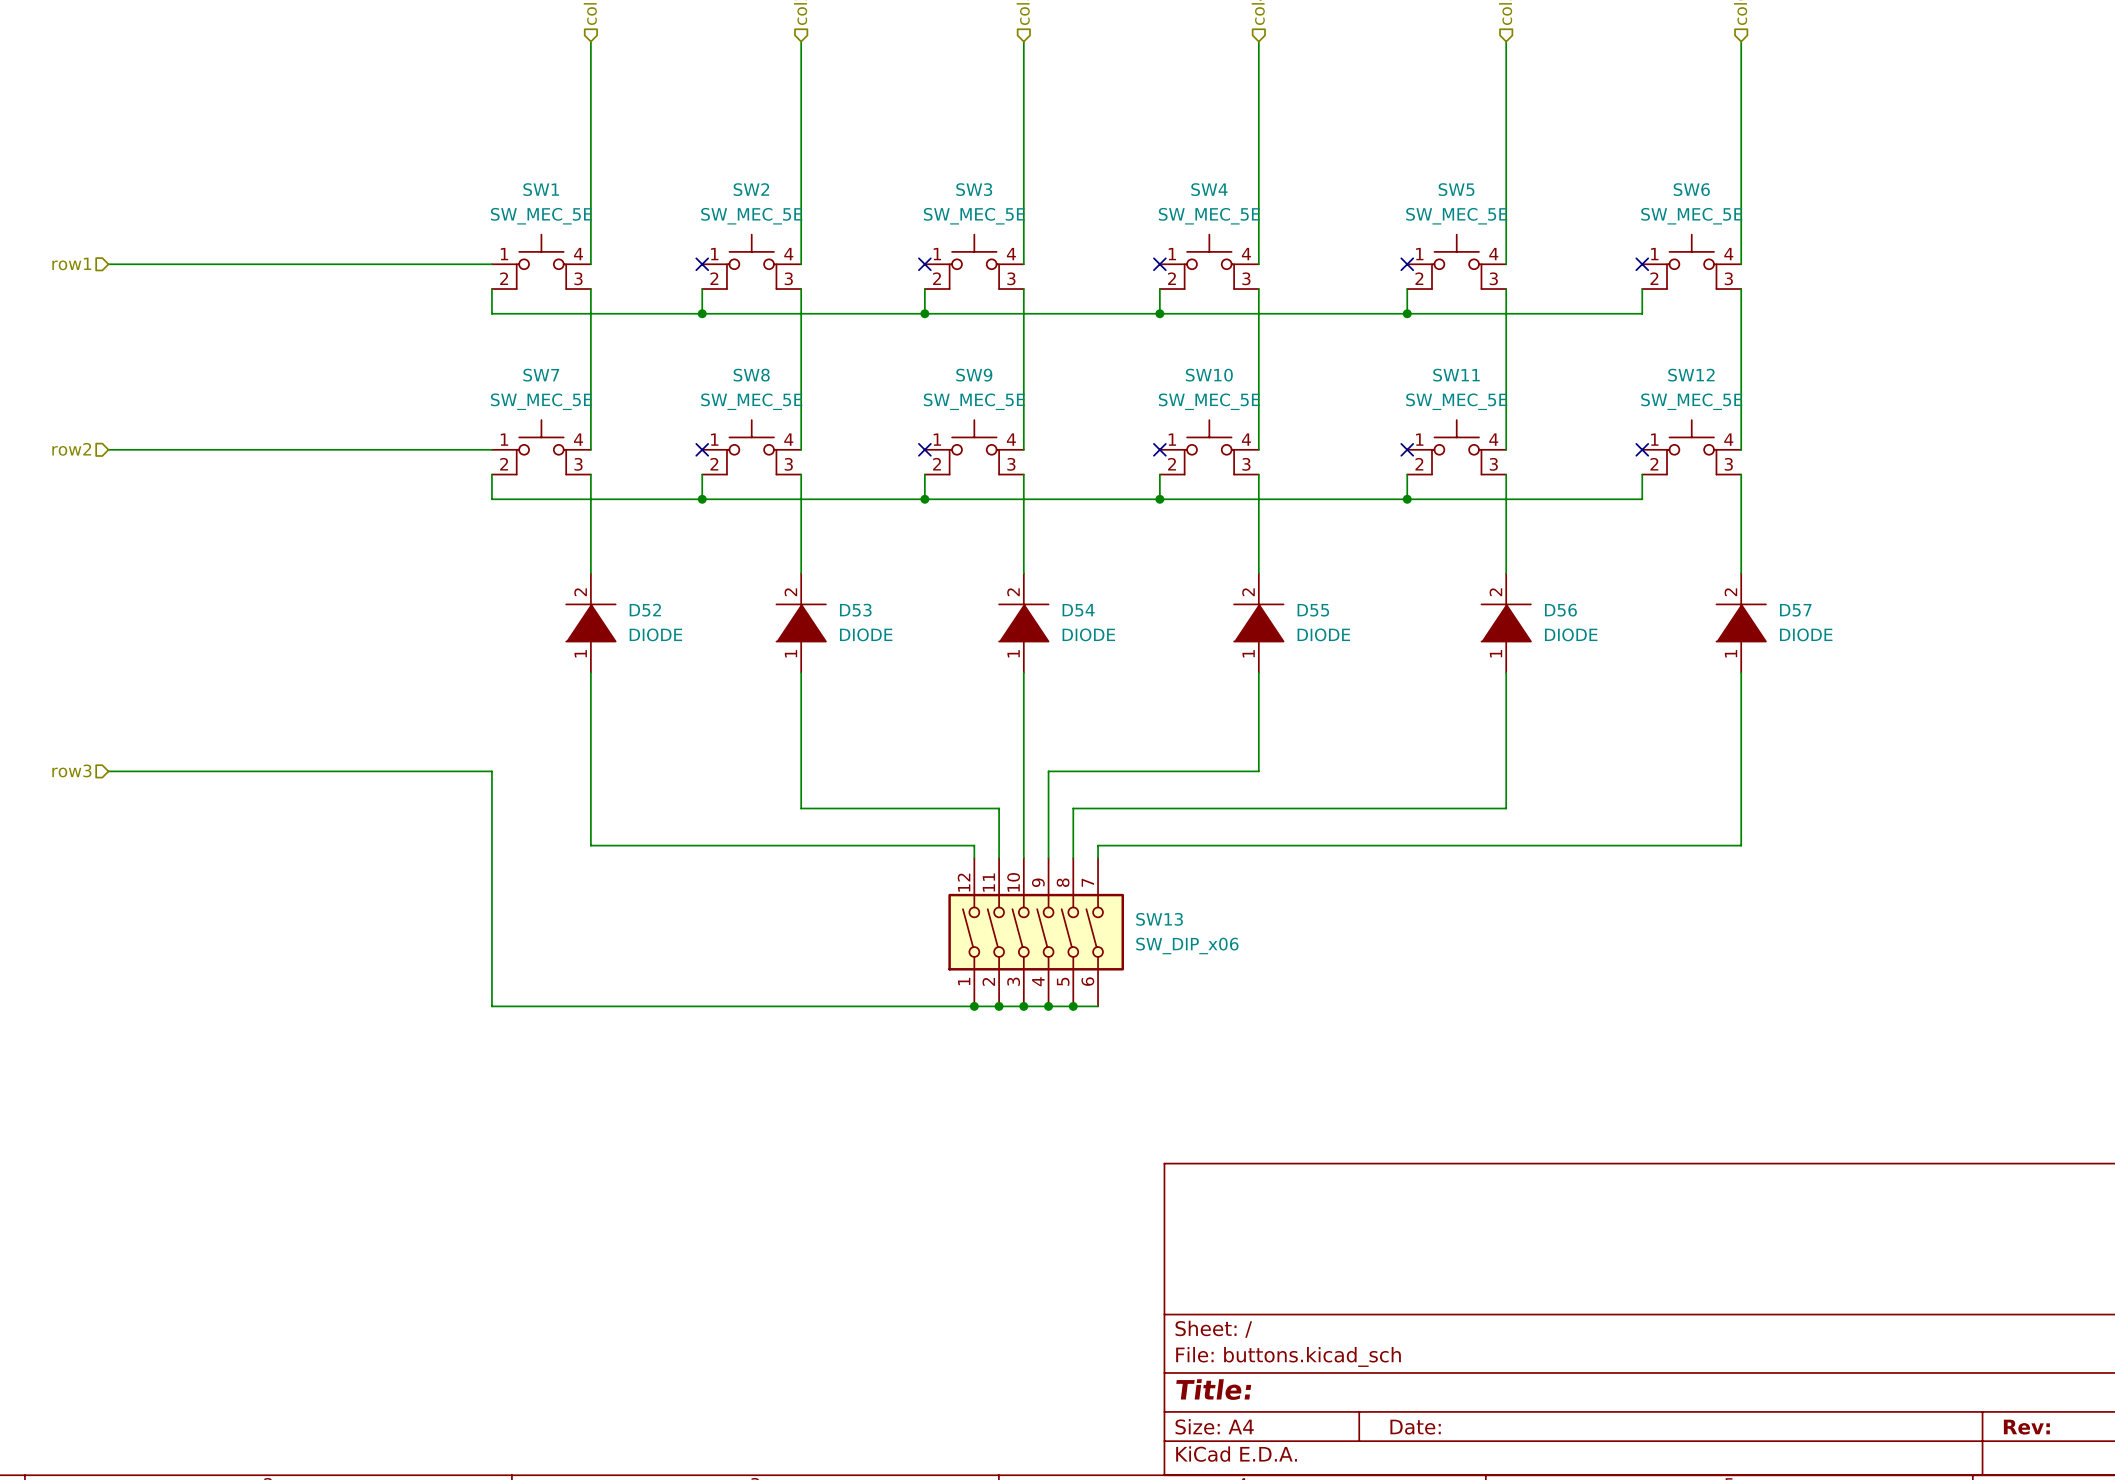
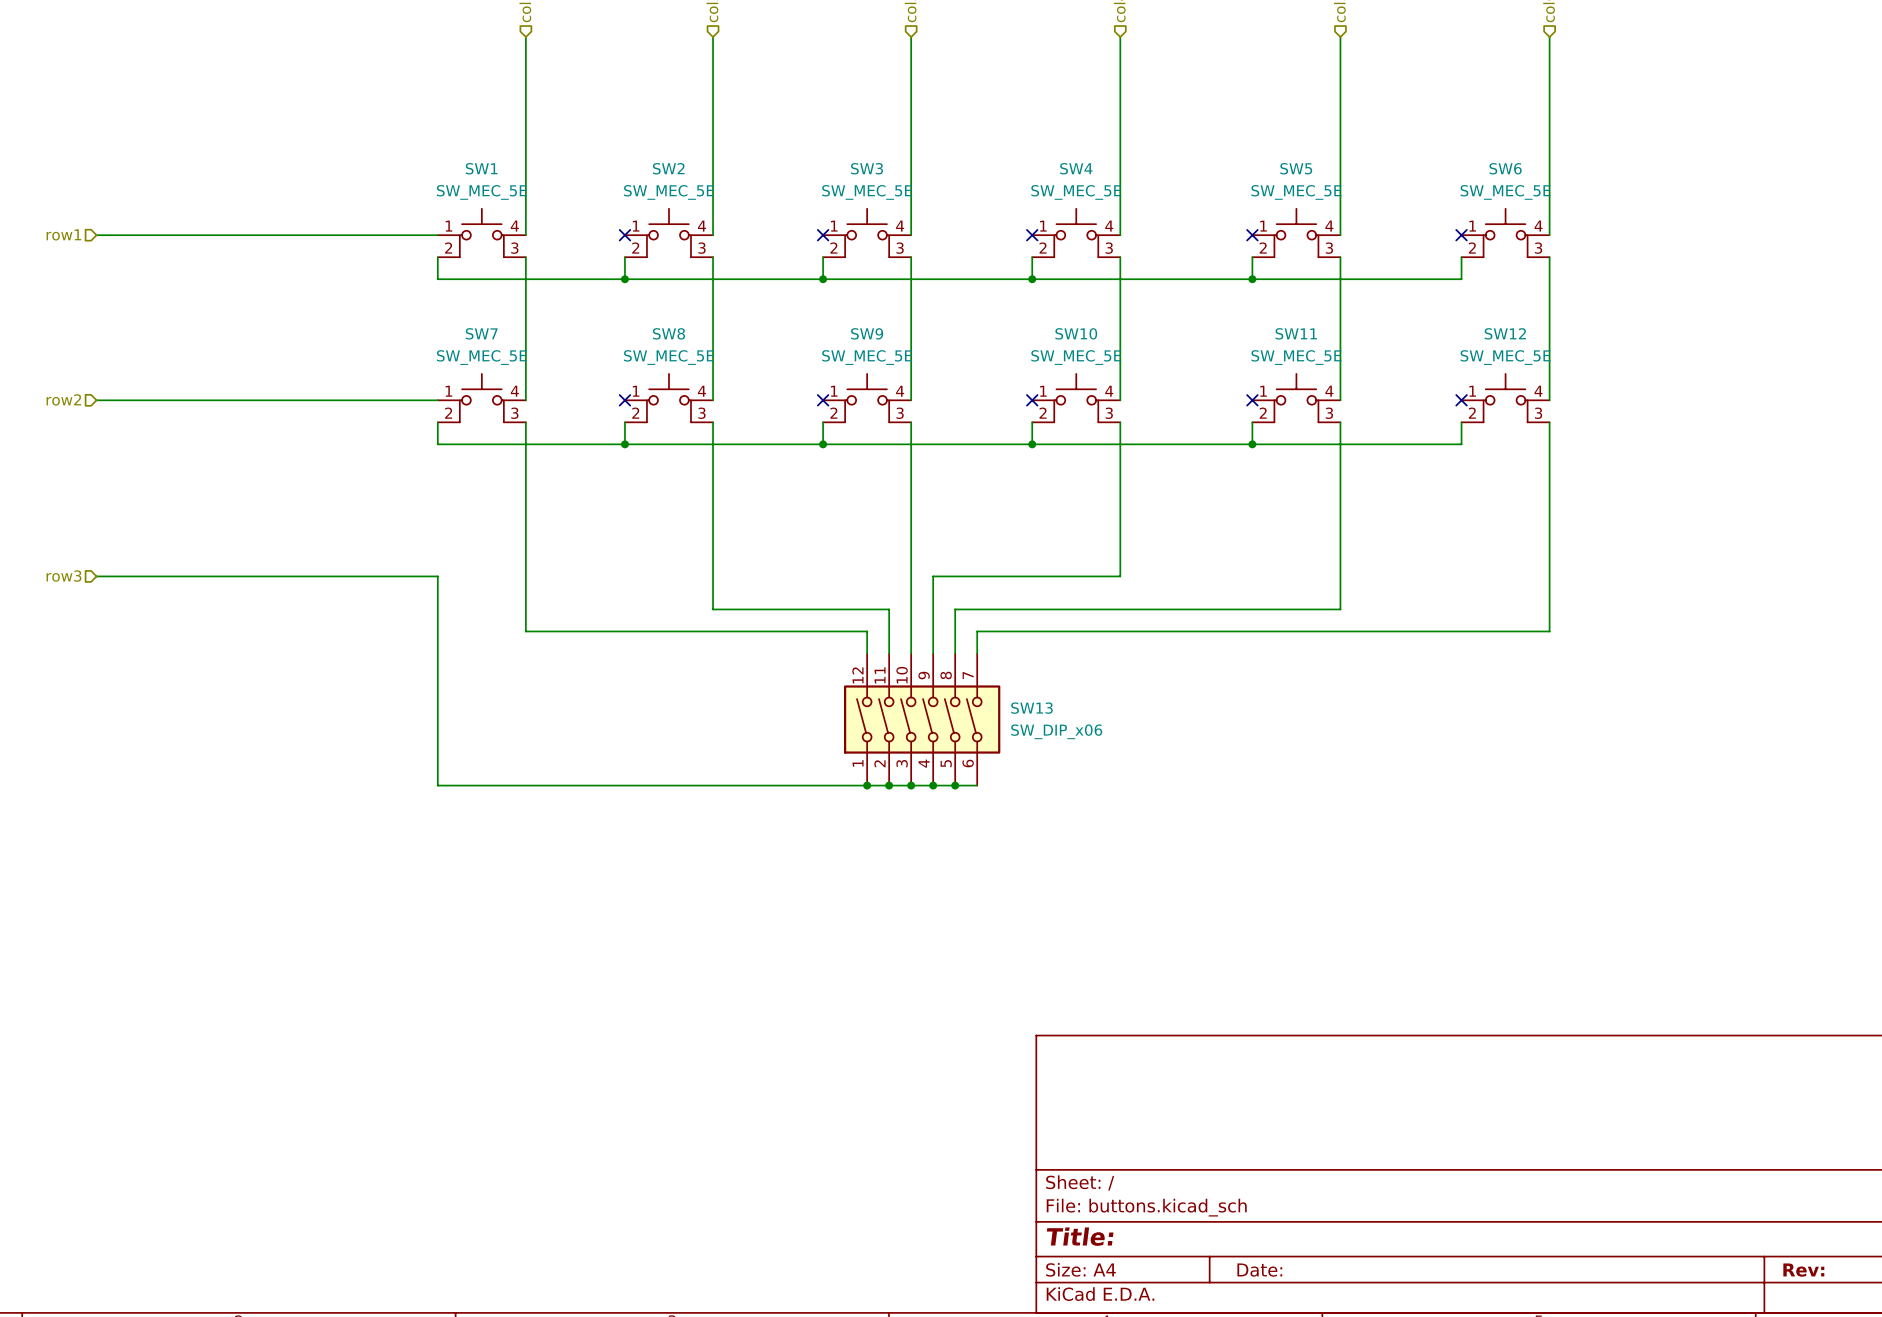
wire: none -> (1120, 510) (1120, 576) (933, 576) (933, 653)
D52: DIODE (590, 622) -> none
D53: DIODE (801, 622) -> none
D54: DIODE (1023, 622) -> none
D55: DIODE (1258, 622) -> none
D56: DIODE (1506, 622) -> none
D57: DIODE (1741, 622) -> none
wire: (1258, 672) (1258, 771) (1048, 771) (1048, 857) -> none
wire: (801, 684) (801, 808) (999, 808) (999, 857) -> (713, 609) (889, 609) (889, 653)
wire: (1506, 684) (1506, 808) (1073, 808) (1073, 857) -> (1340, 609) (955, 609) (955, 653)
wire: (590, 709) (590, 845) (974, 845) (974, 857) -> (525, 631) (867, 631) (867, 653)
wire: (1741, 709) (1741, 845) (1098, 845) (1098, 857) -> (1549, 631) (977, 631) (977, 653)
hierarchical label position: row3 (71, 770) -> row3 (63, 576)
wire: (108, 771) (491, 771) -> (96, 576) (437, 576) (437, 686)
wire: (491, 882) (491, 1006) (1098, 1006) -> (437, 785) (977, 785)
junction: none -> (867, 785)
junction: none -> (889, 785)
junction: none -> (911, 785)
junction: none -> (933, 785)
junction: none -> (955, 785)
SW13 position: (1036, 932) -> (922, 719)
junction: (974, 1006) -> none
junction: (999, 1006) -> none
junction: (1023, 1006) -> none
junction: (1048, 1006) -> none
junction: (1073, 1006) -> none

